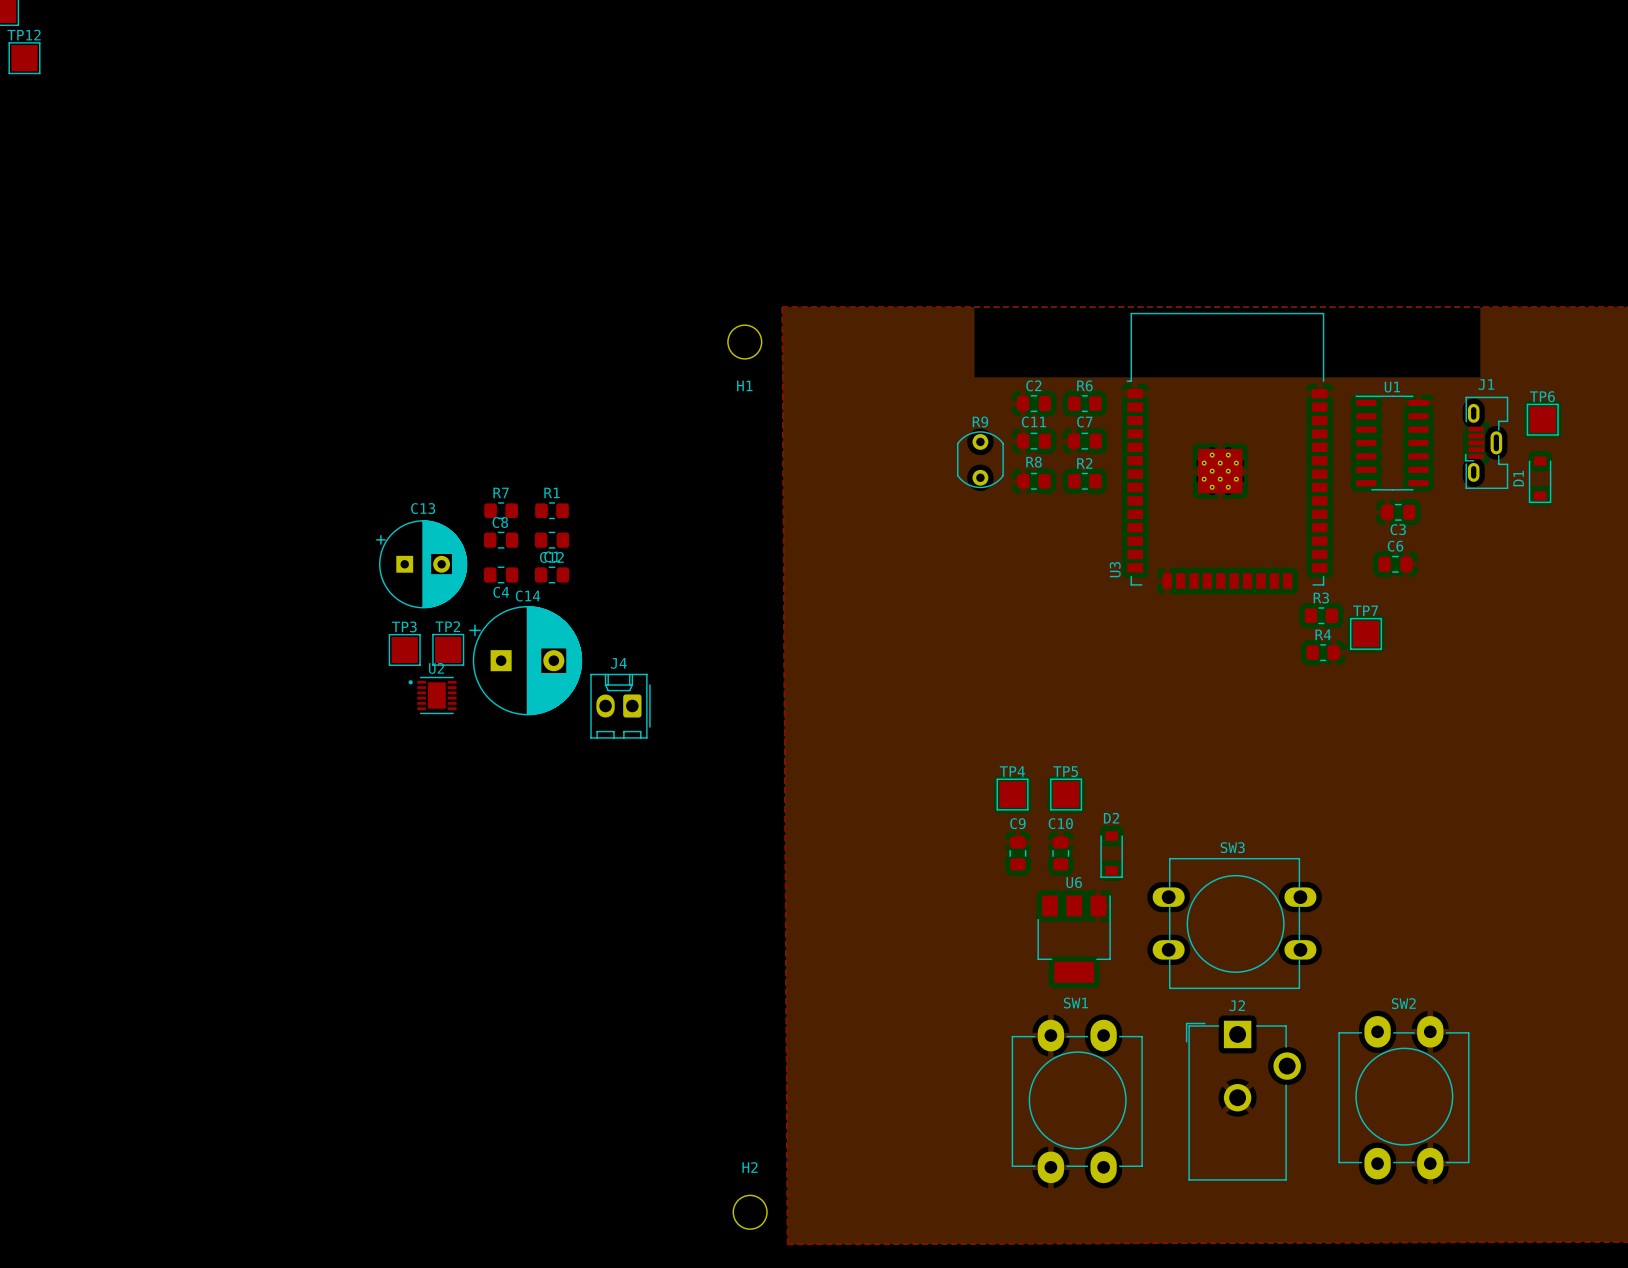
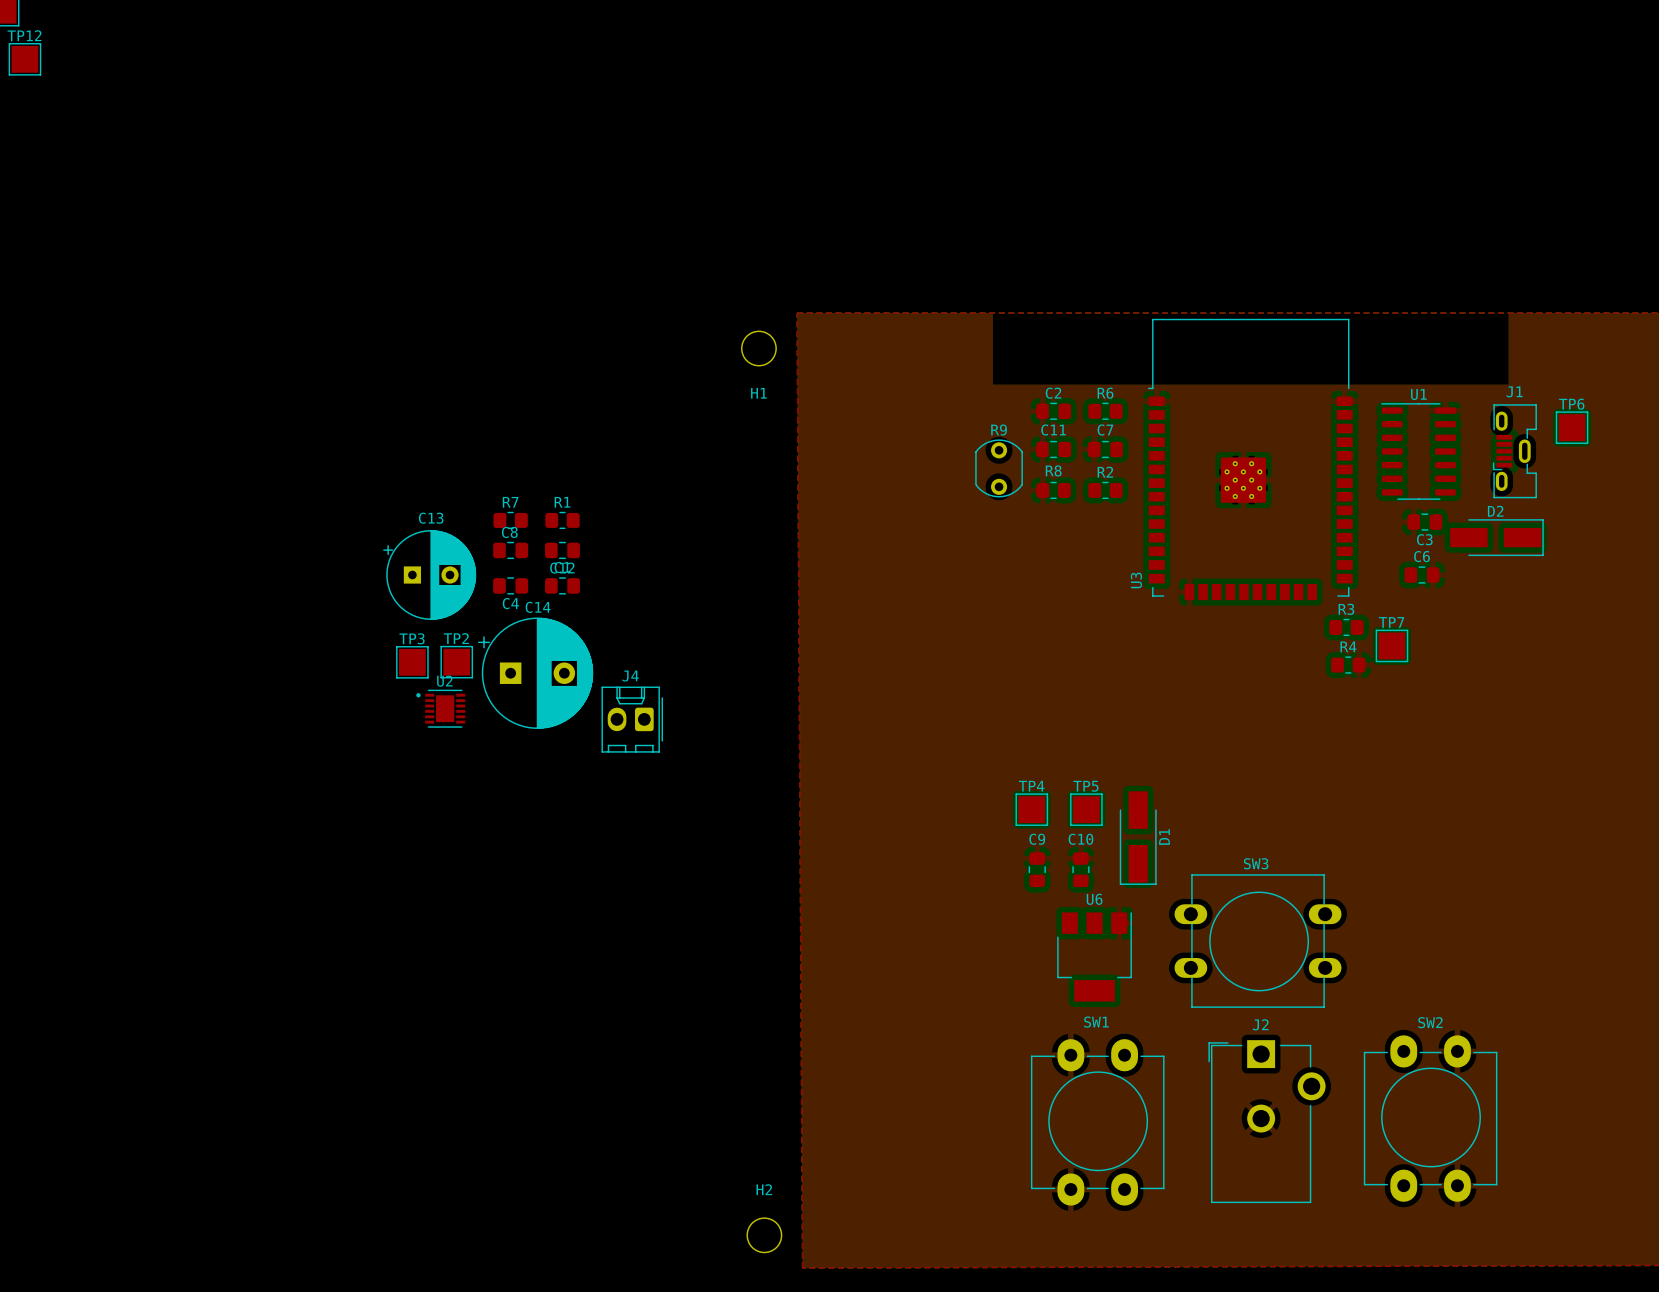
D1 footprint: [1528, 456, 1552, 503] -> [1119, 791, 1157, 885]
D1 name position: D1 (1518, 478) -> D1 (1164, 836)
D2 footprint: [1100, 831, 1123, 878] -> [1450, 519, 1544, 557]

